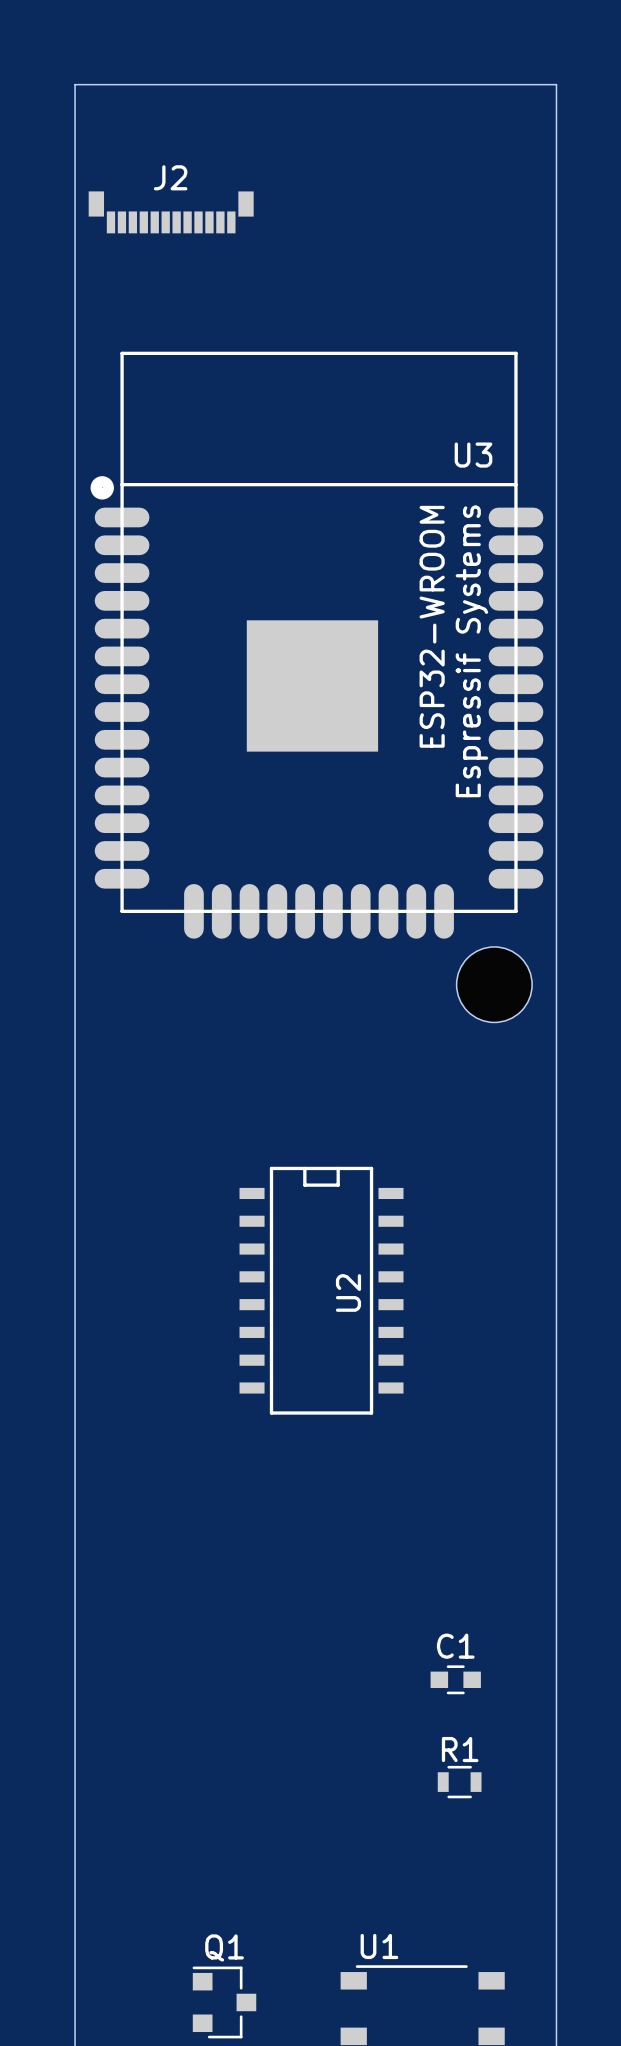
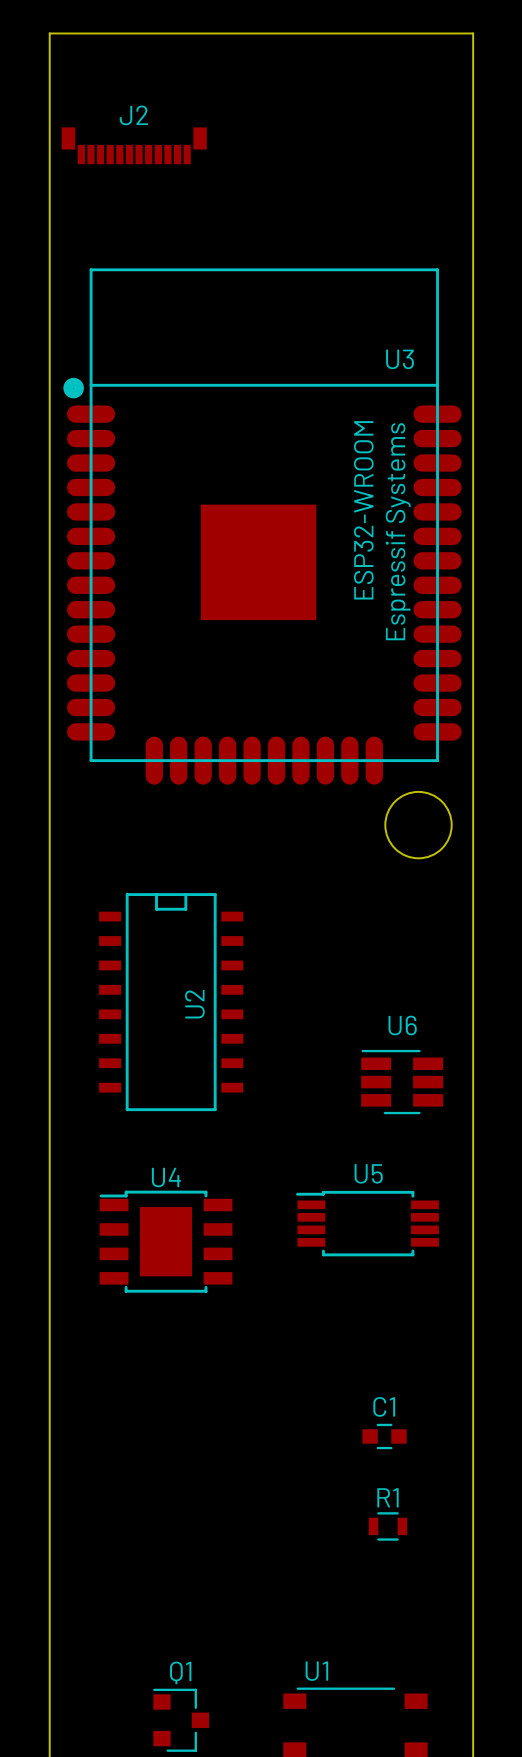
U6: none -> (402, 1082)
U2 position: (321, 1290) -> (171, 1002)
U5: none -> (367, 1223)
U4: none -> (166, 1241)

